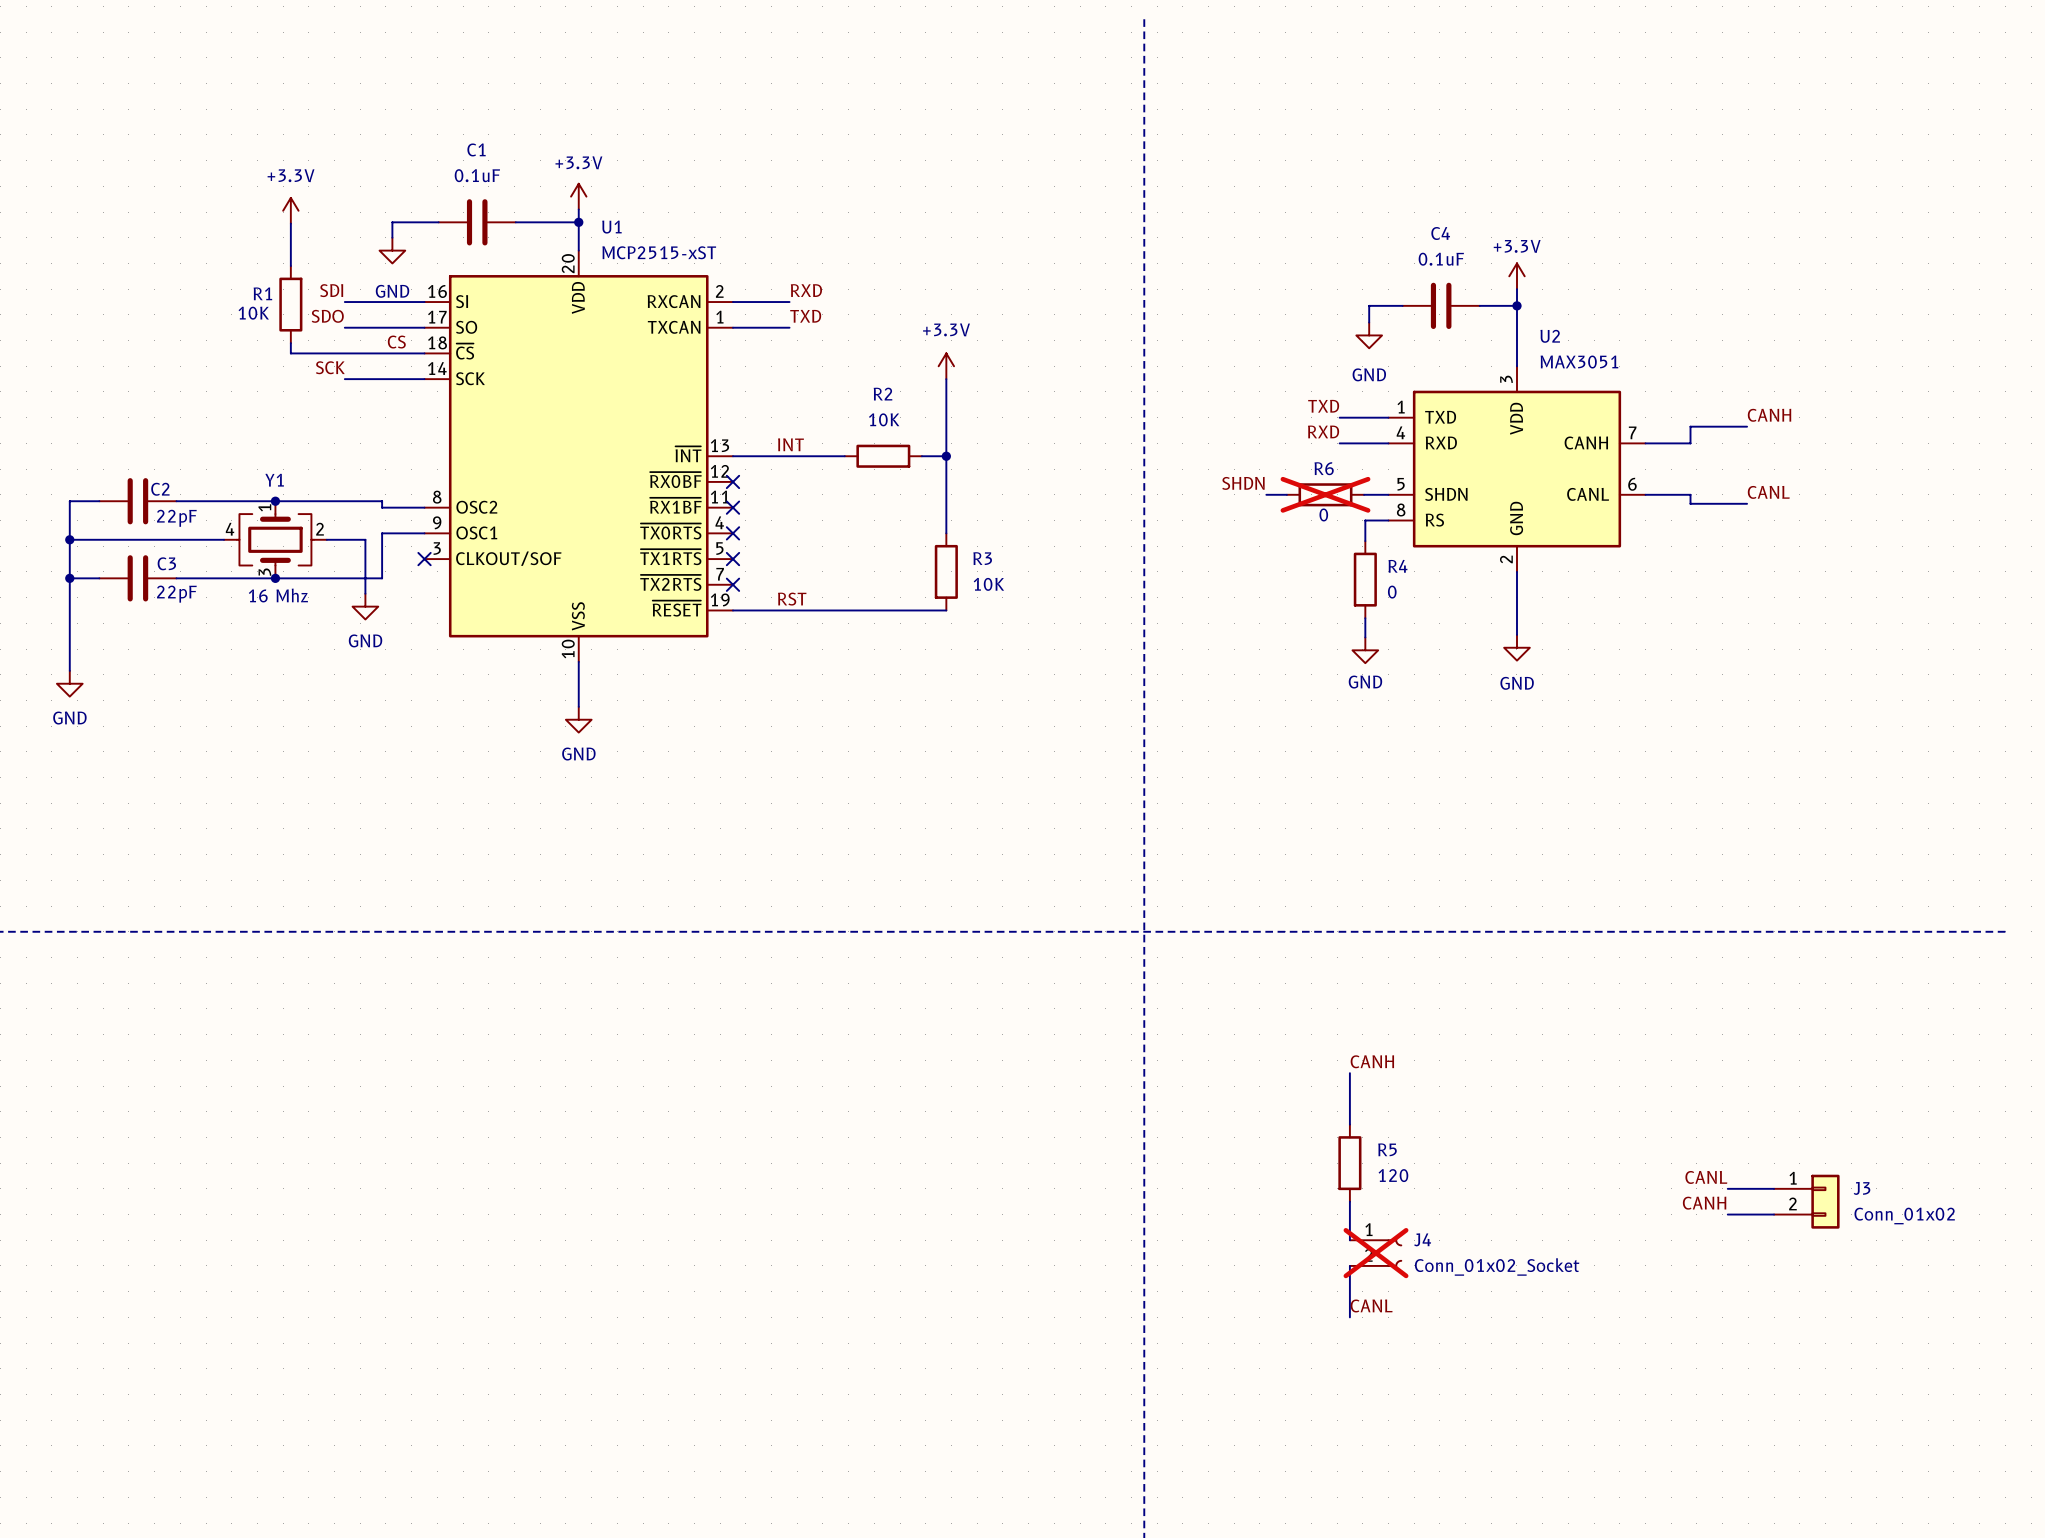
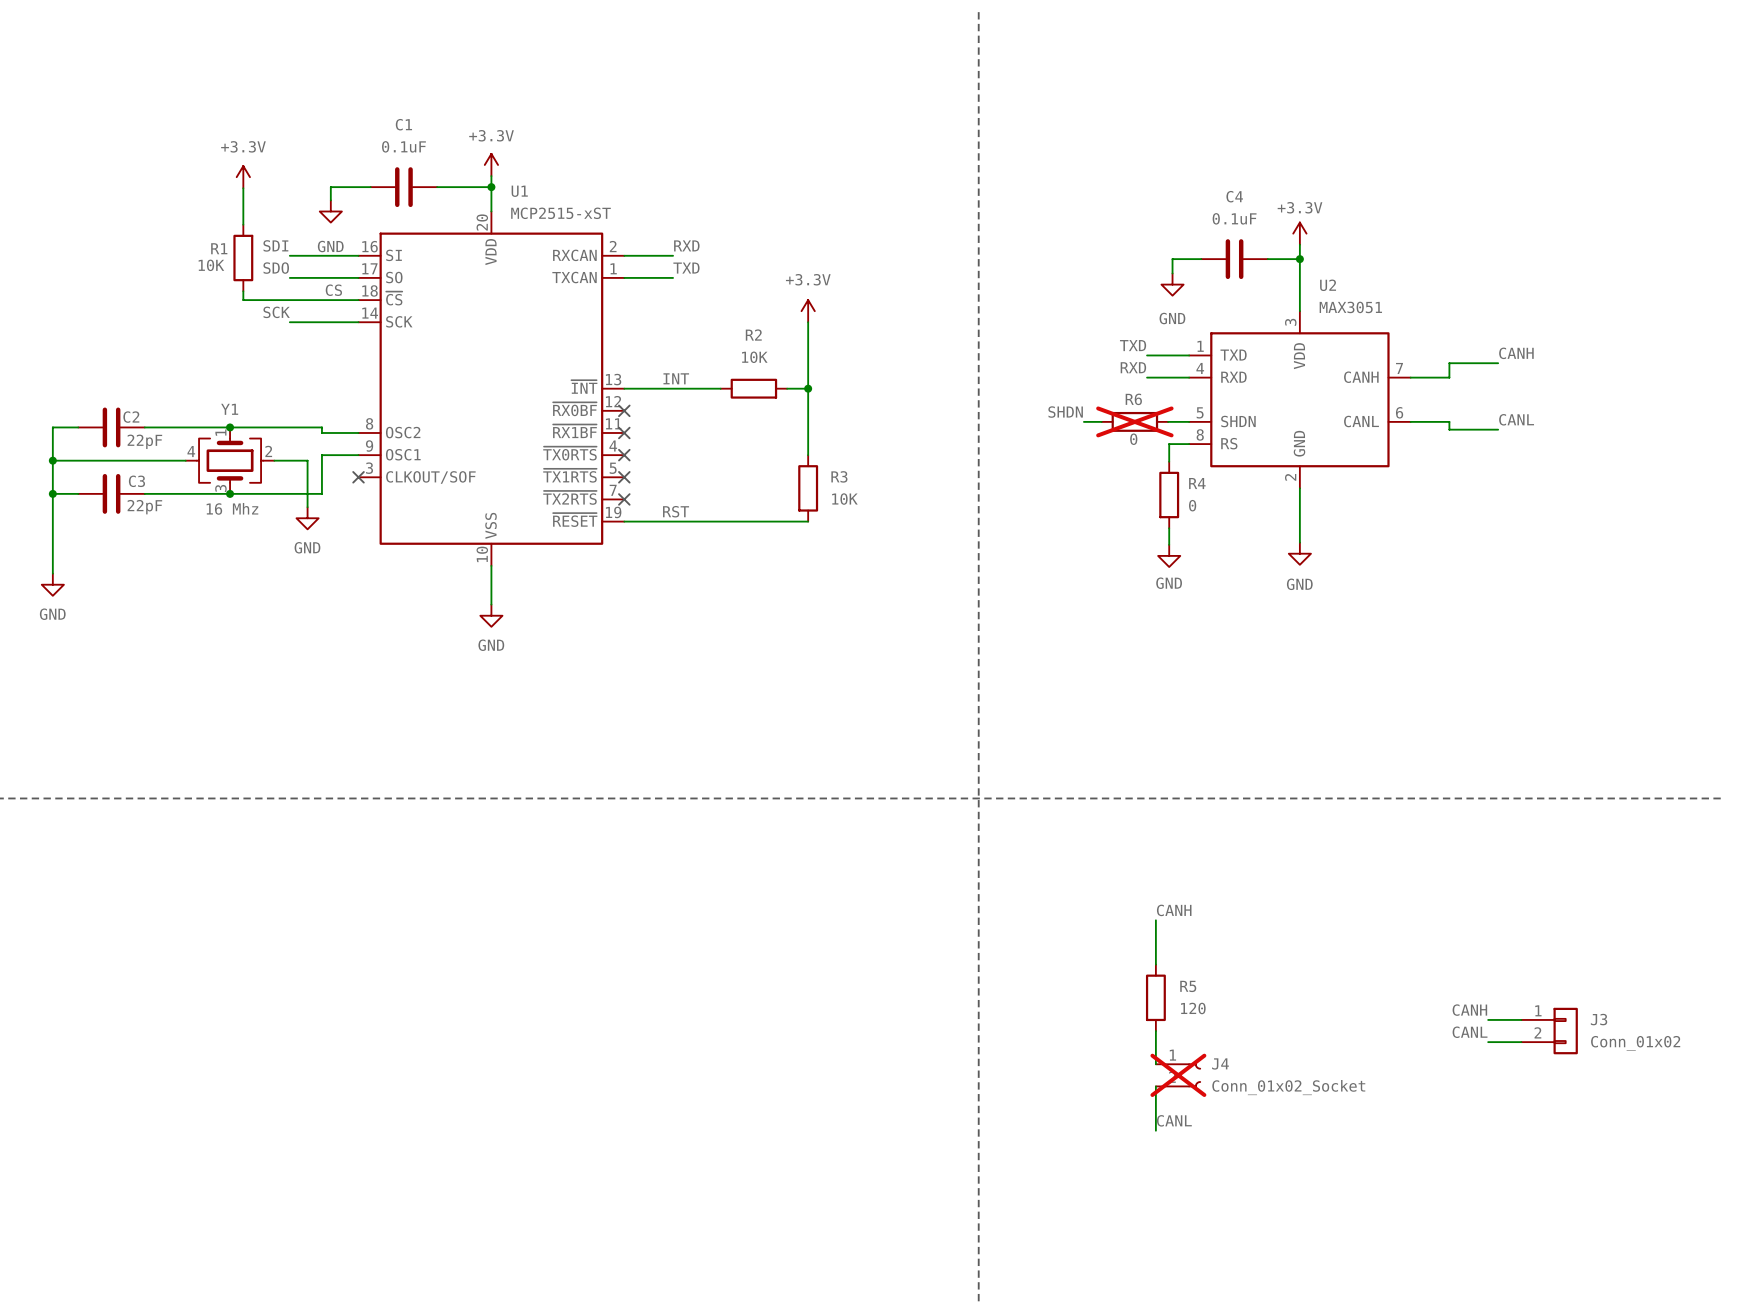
label: CANL (1706, 1177) -> CANH (1469, 1010)
wire: (1727, 1188) (1735, 1188) -> none
label: CANH (1704, 1203) -> CANL (1470, 1032)
wire: (1727, 1214) (1735, 1214) -> none

